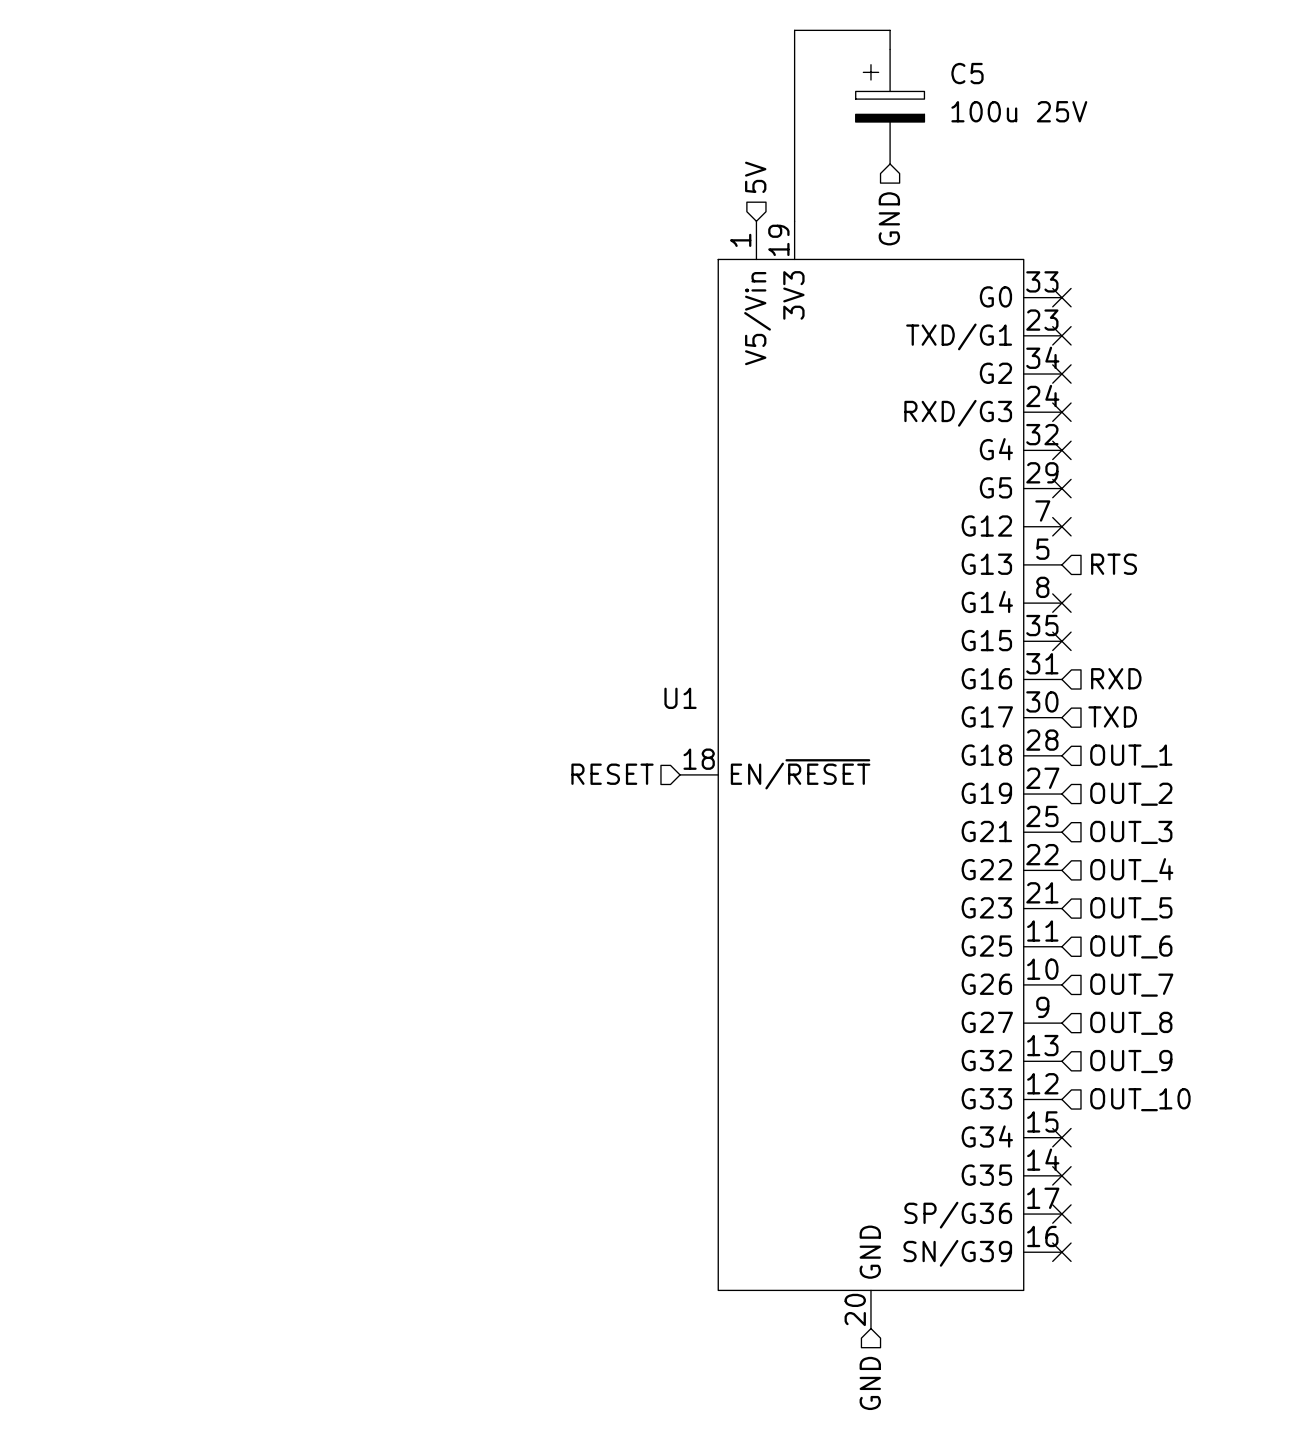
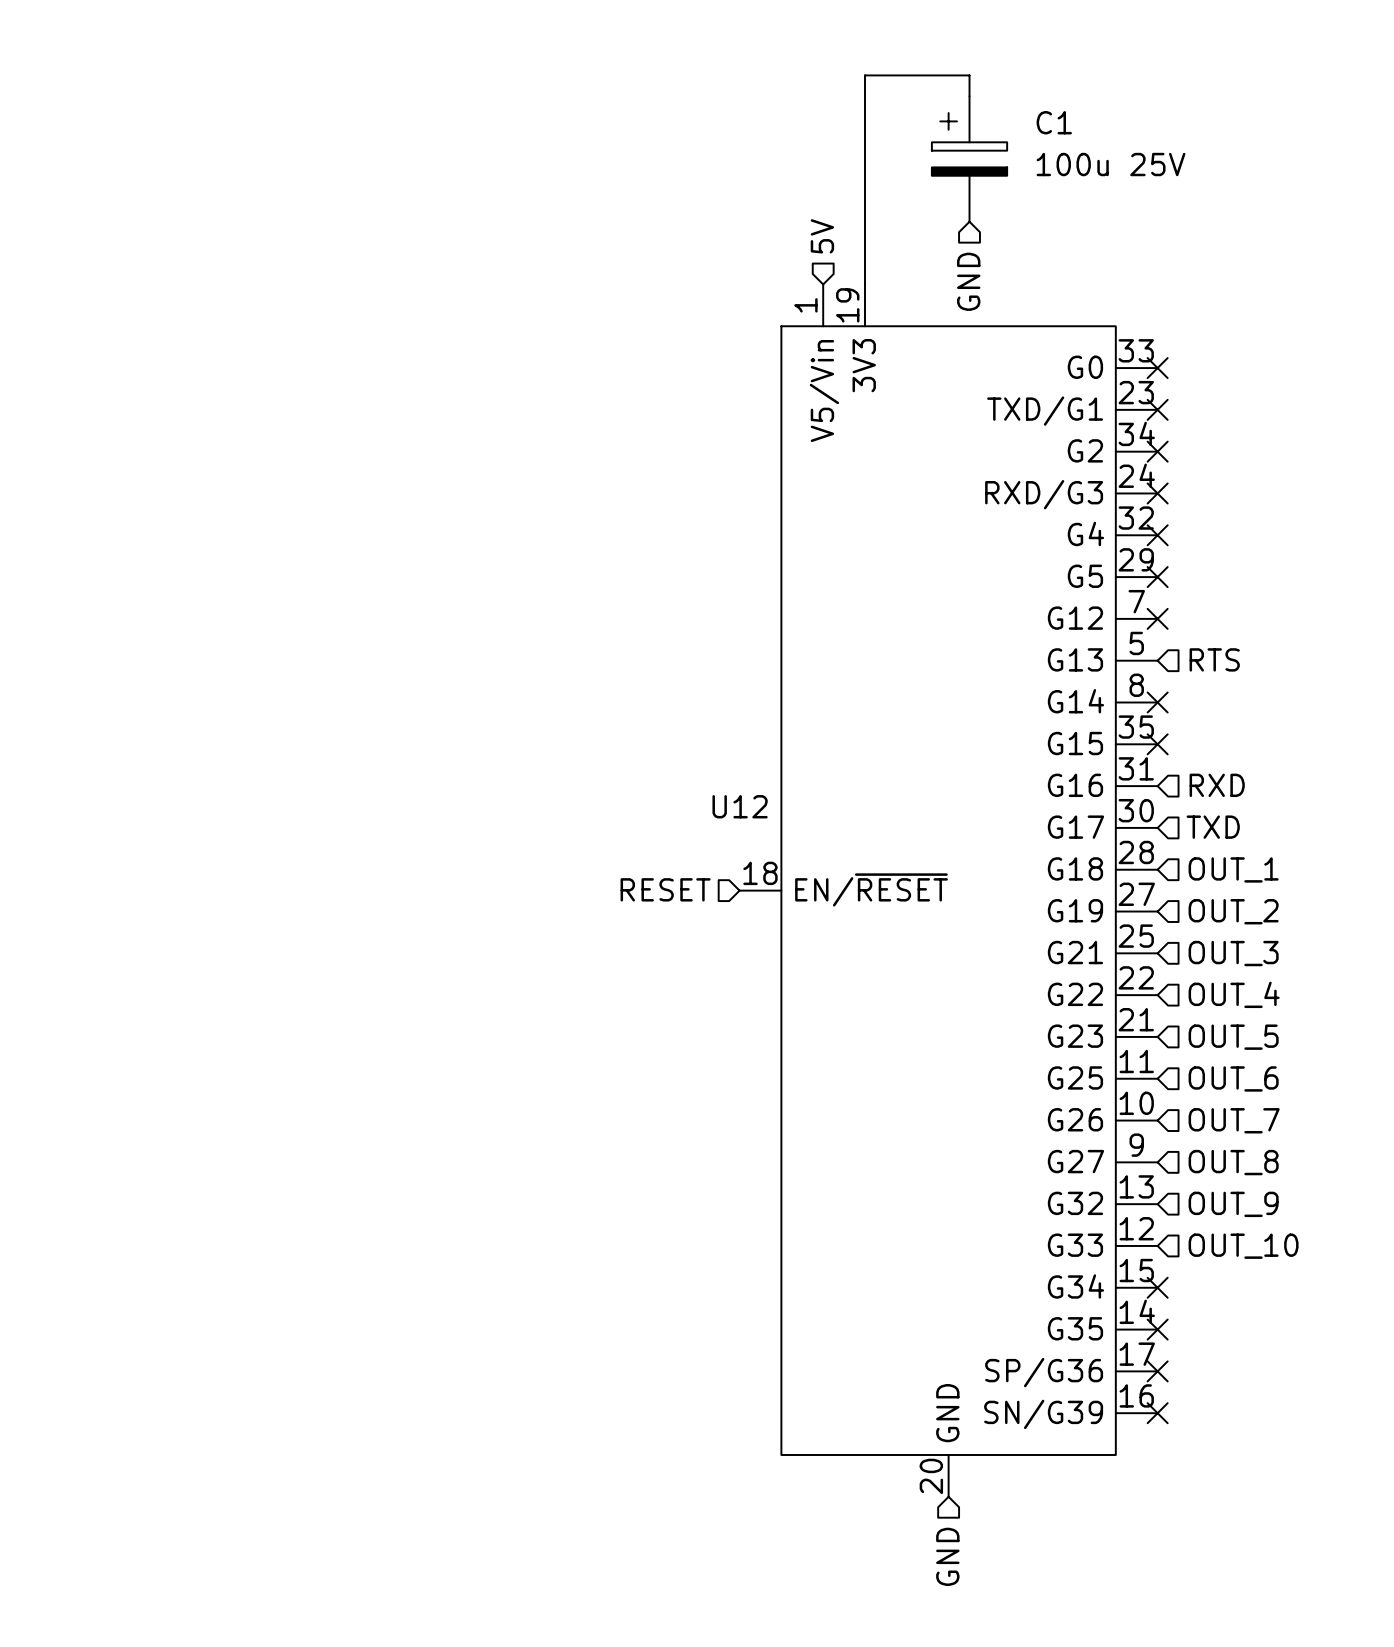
C5 name: C5 (967, 73) -> C1 (1054, 122)
U1 name: U1 (680, 698) -> U12 (740, 806)

